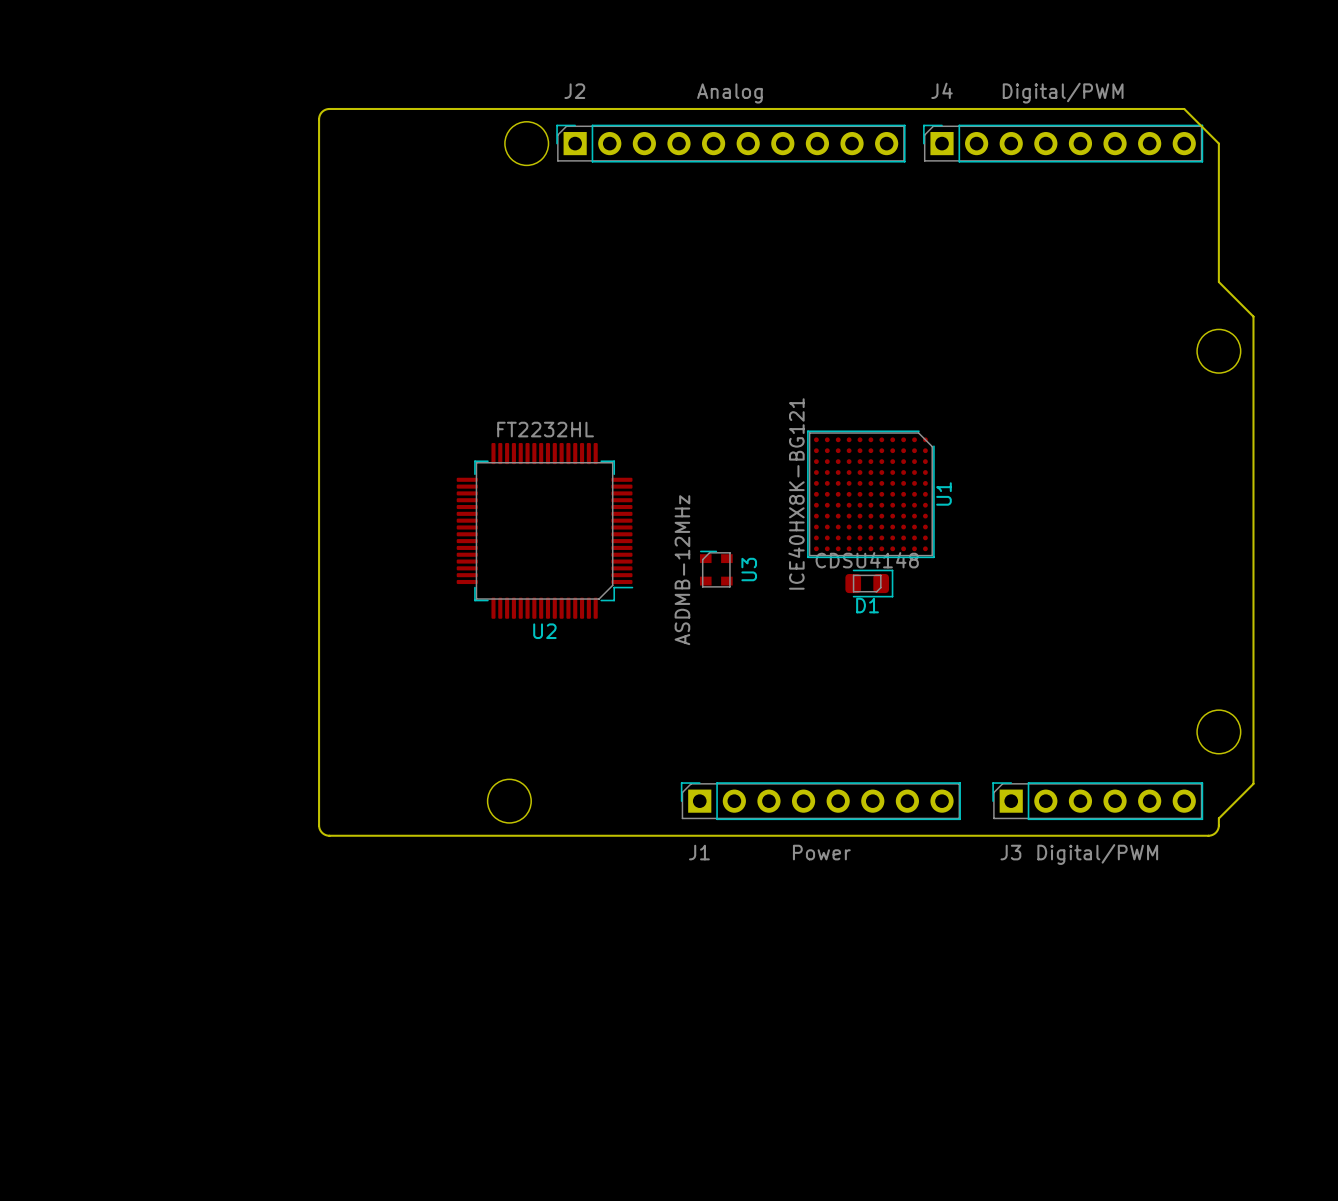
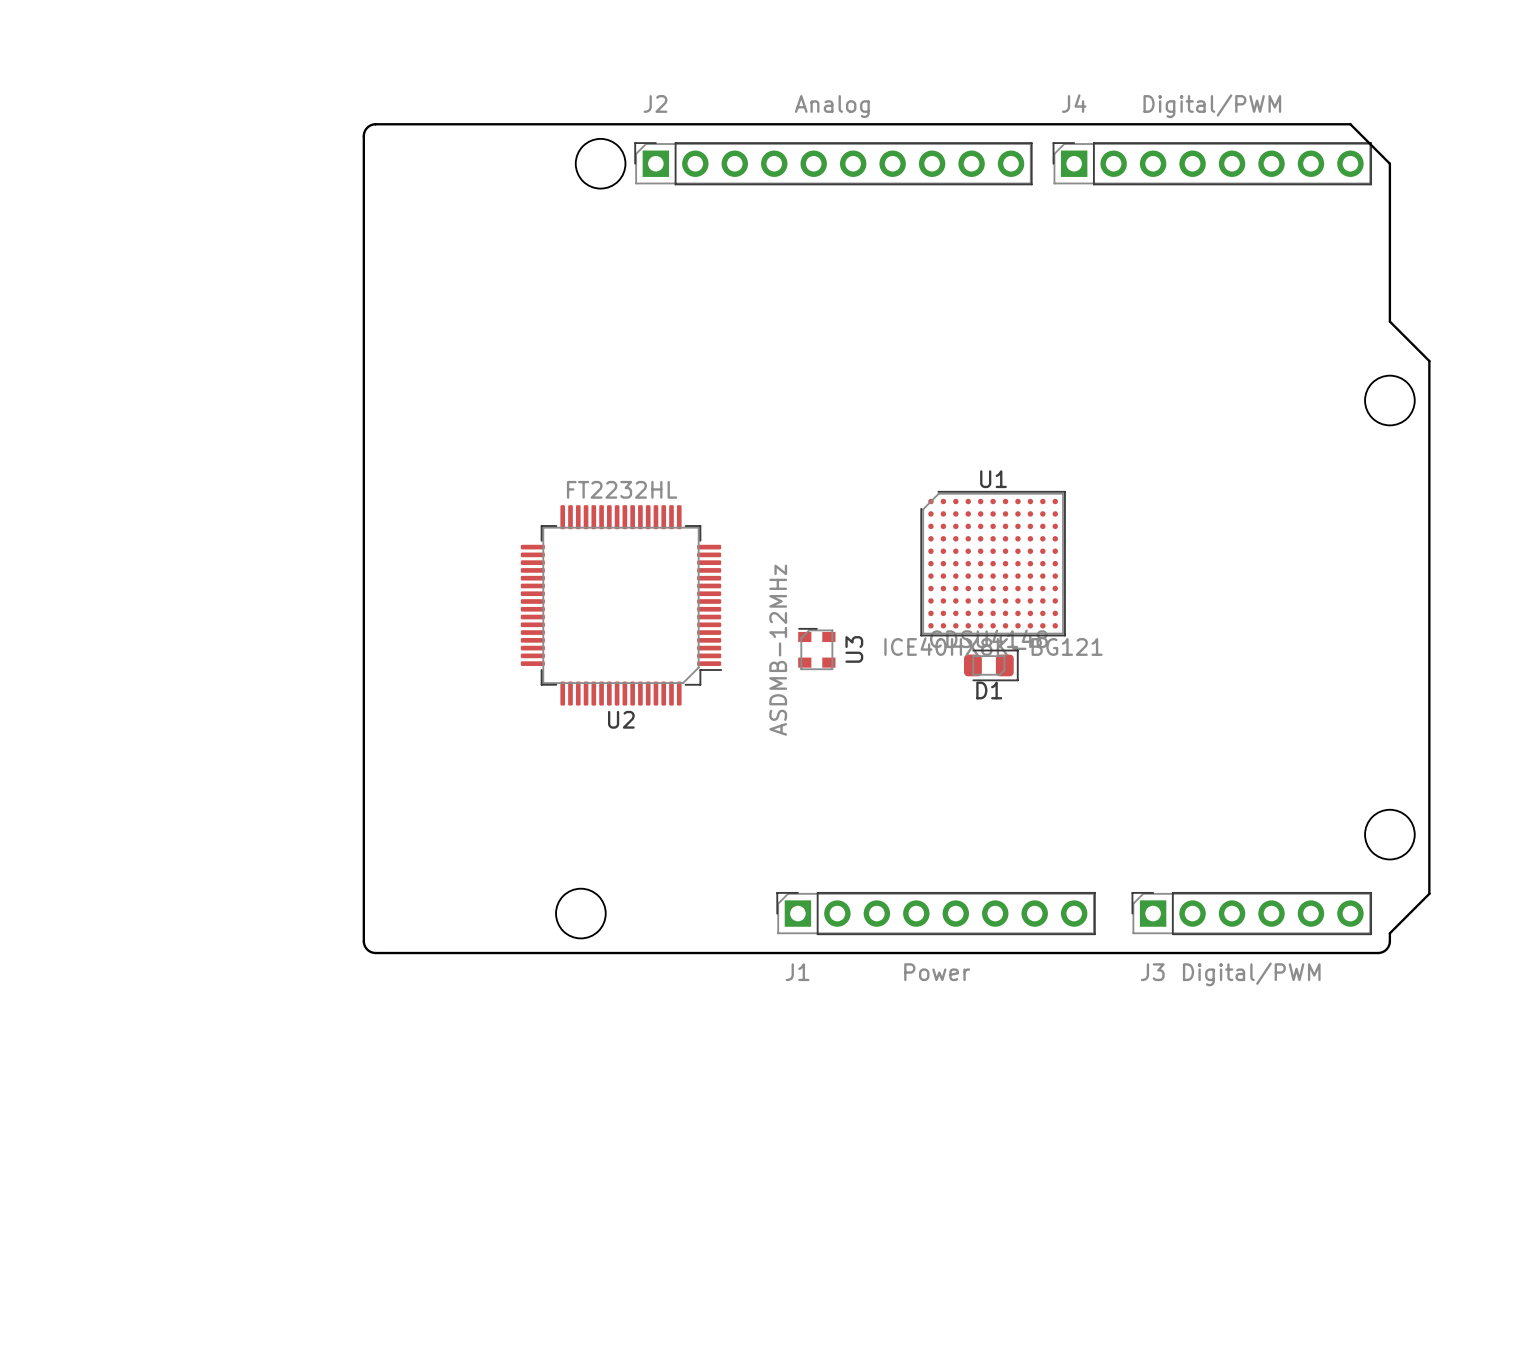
U1 rotation: 0° (870, 494) -> 90° counterclockwise (993, 563)

